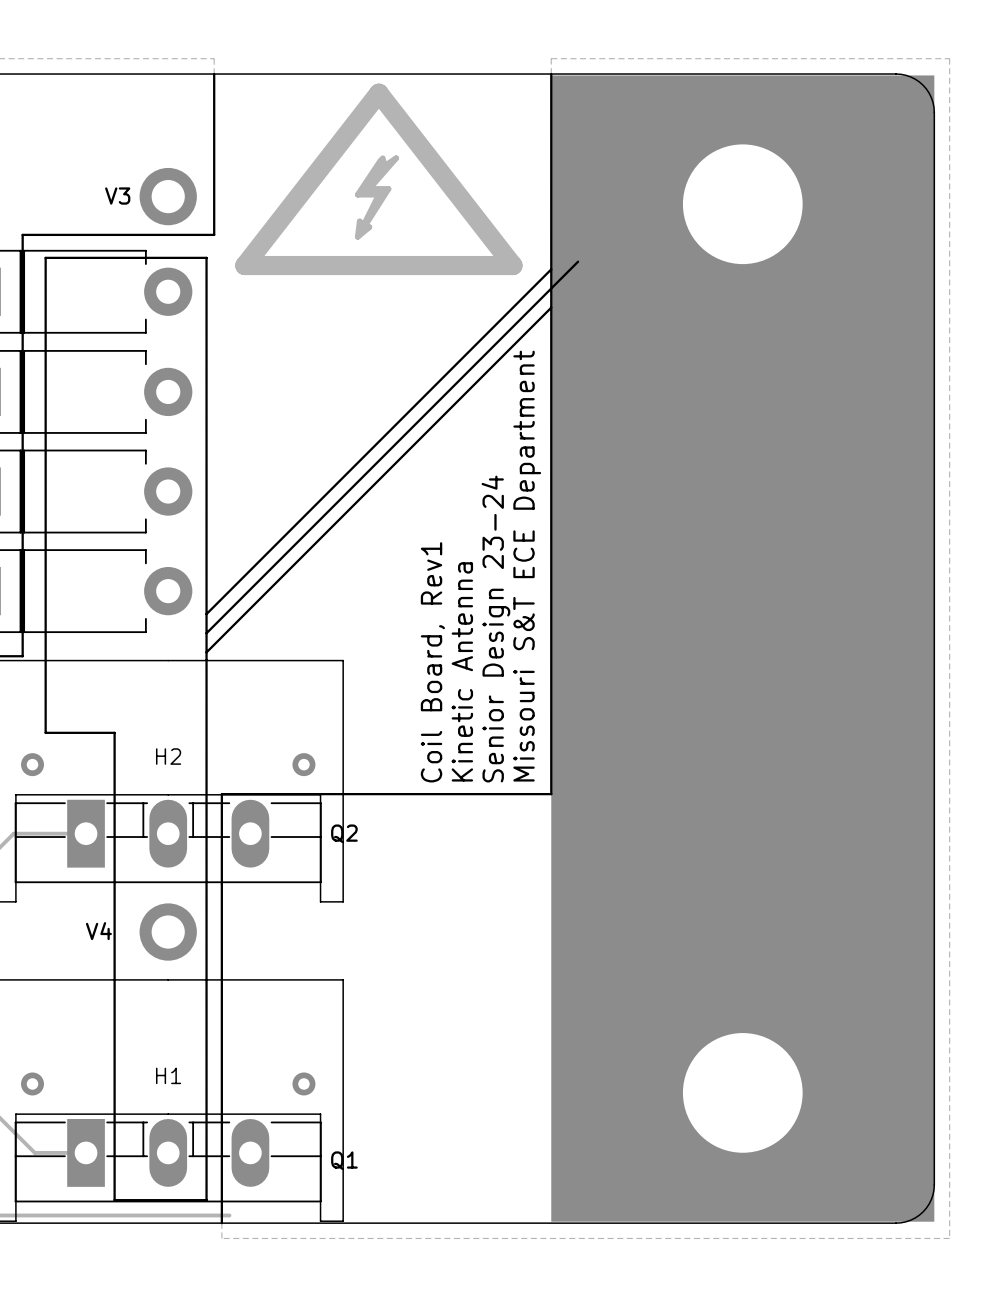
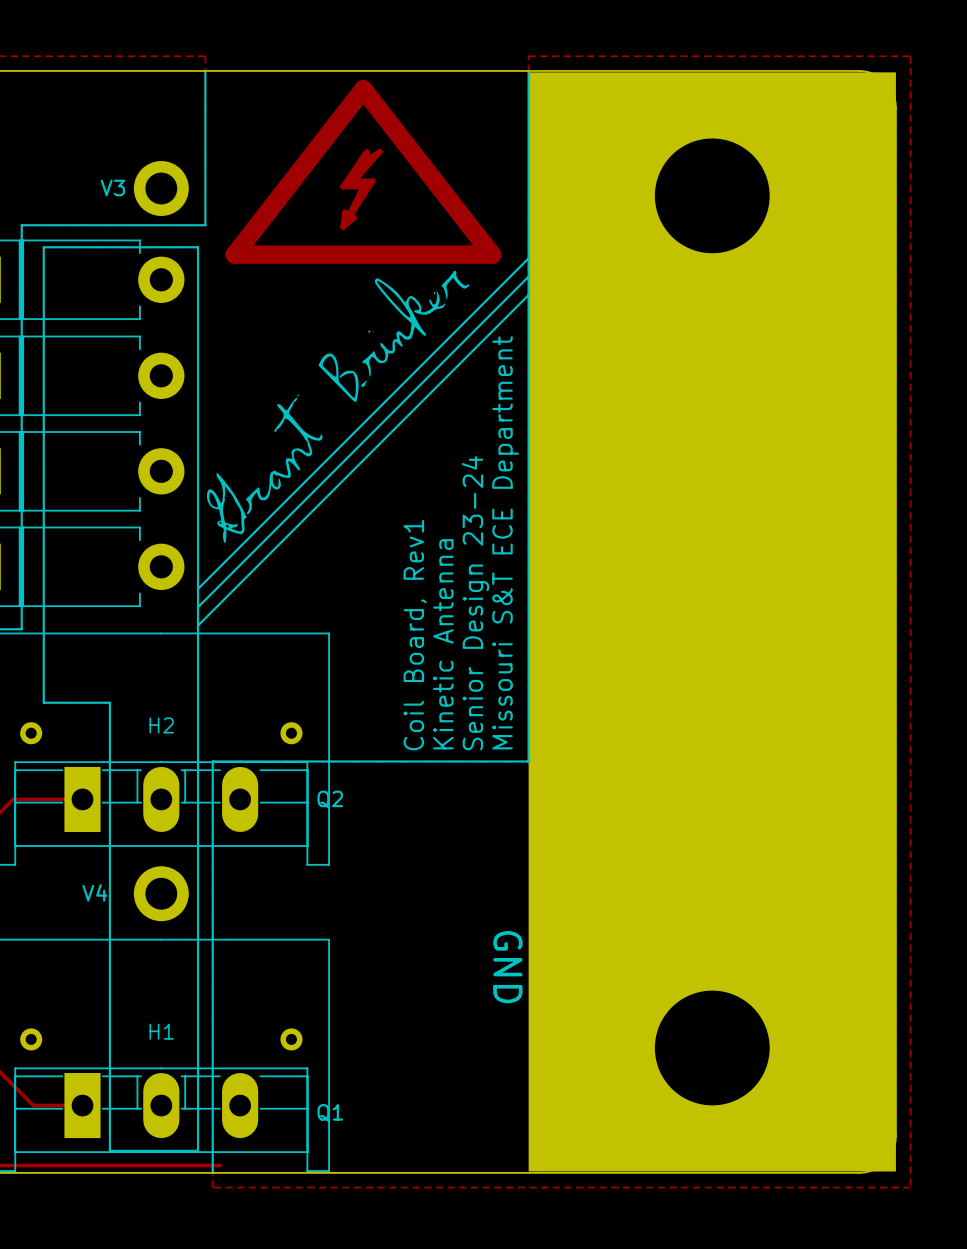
line: (578, 261) (551, 288) -> none
drawing: none -> [206, 270, 470, 544]
text: none -> GND (507, 967)

